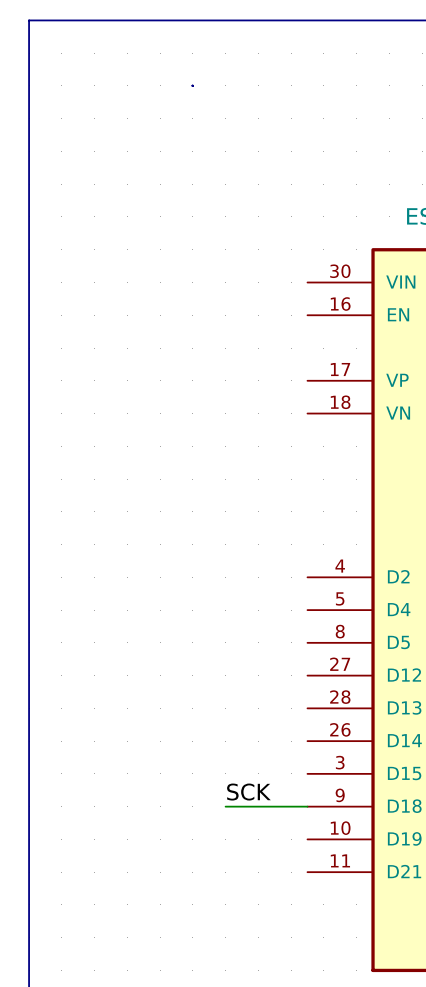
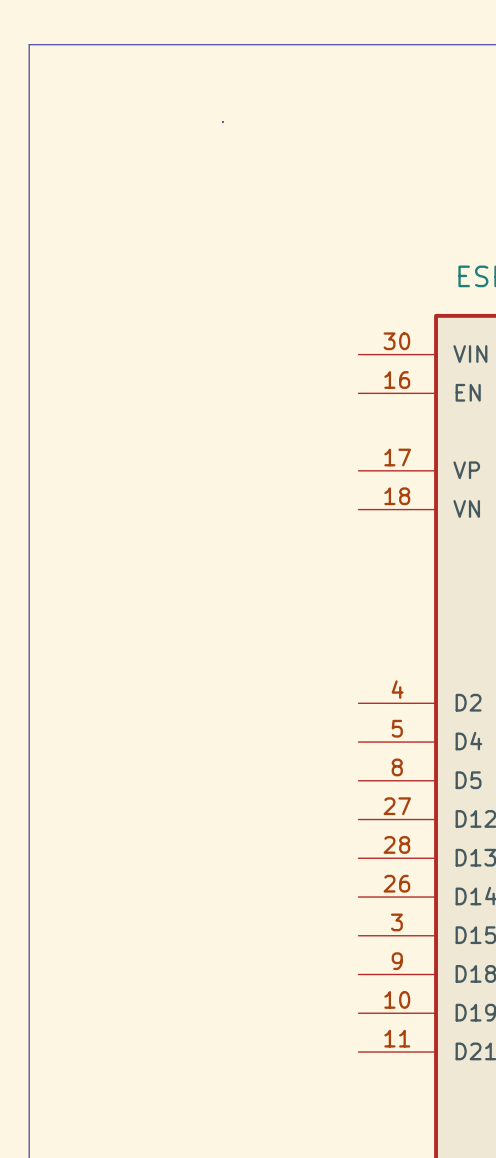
label: SCK (248, 792) -> none
wire: (225, 806) (307, 806) -> none

